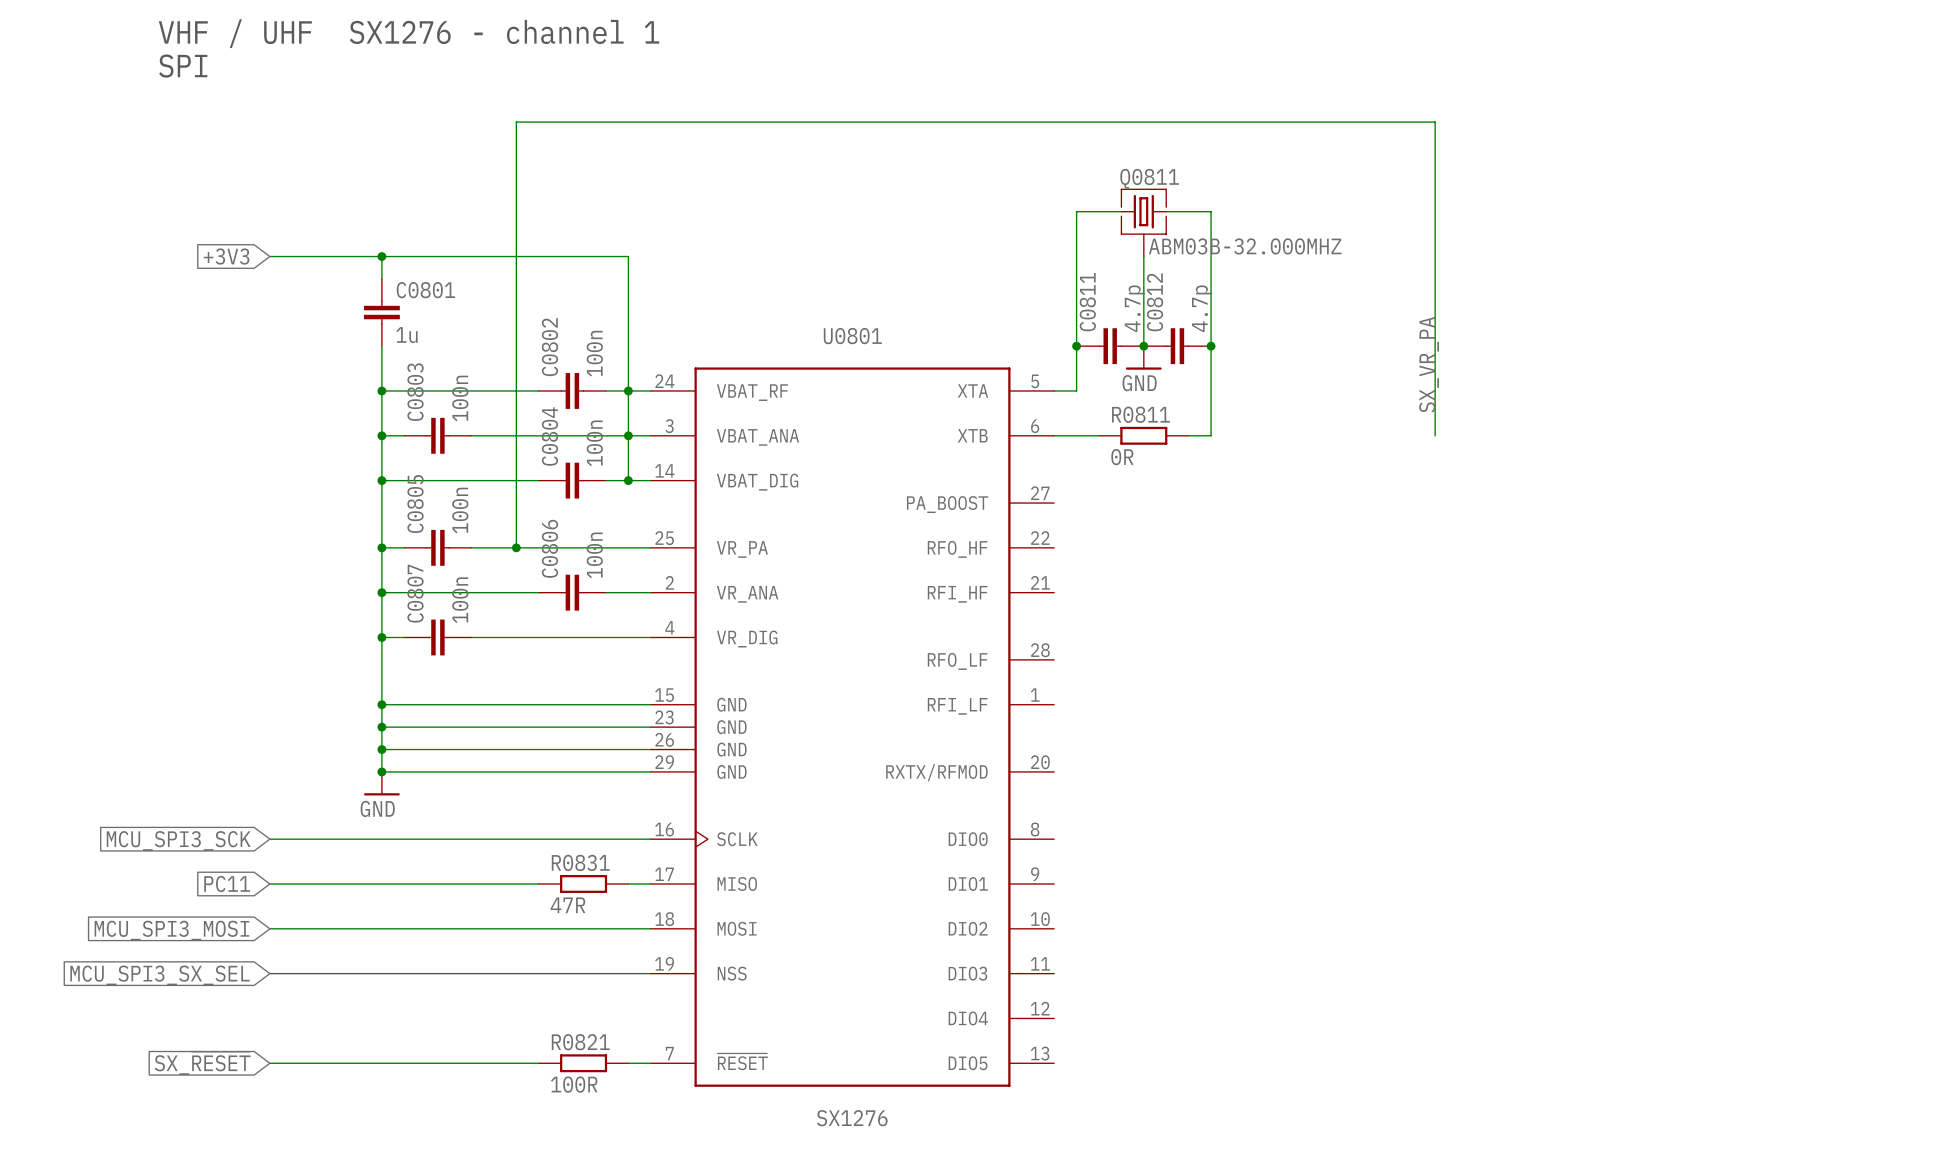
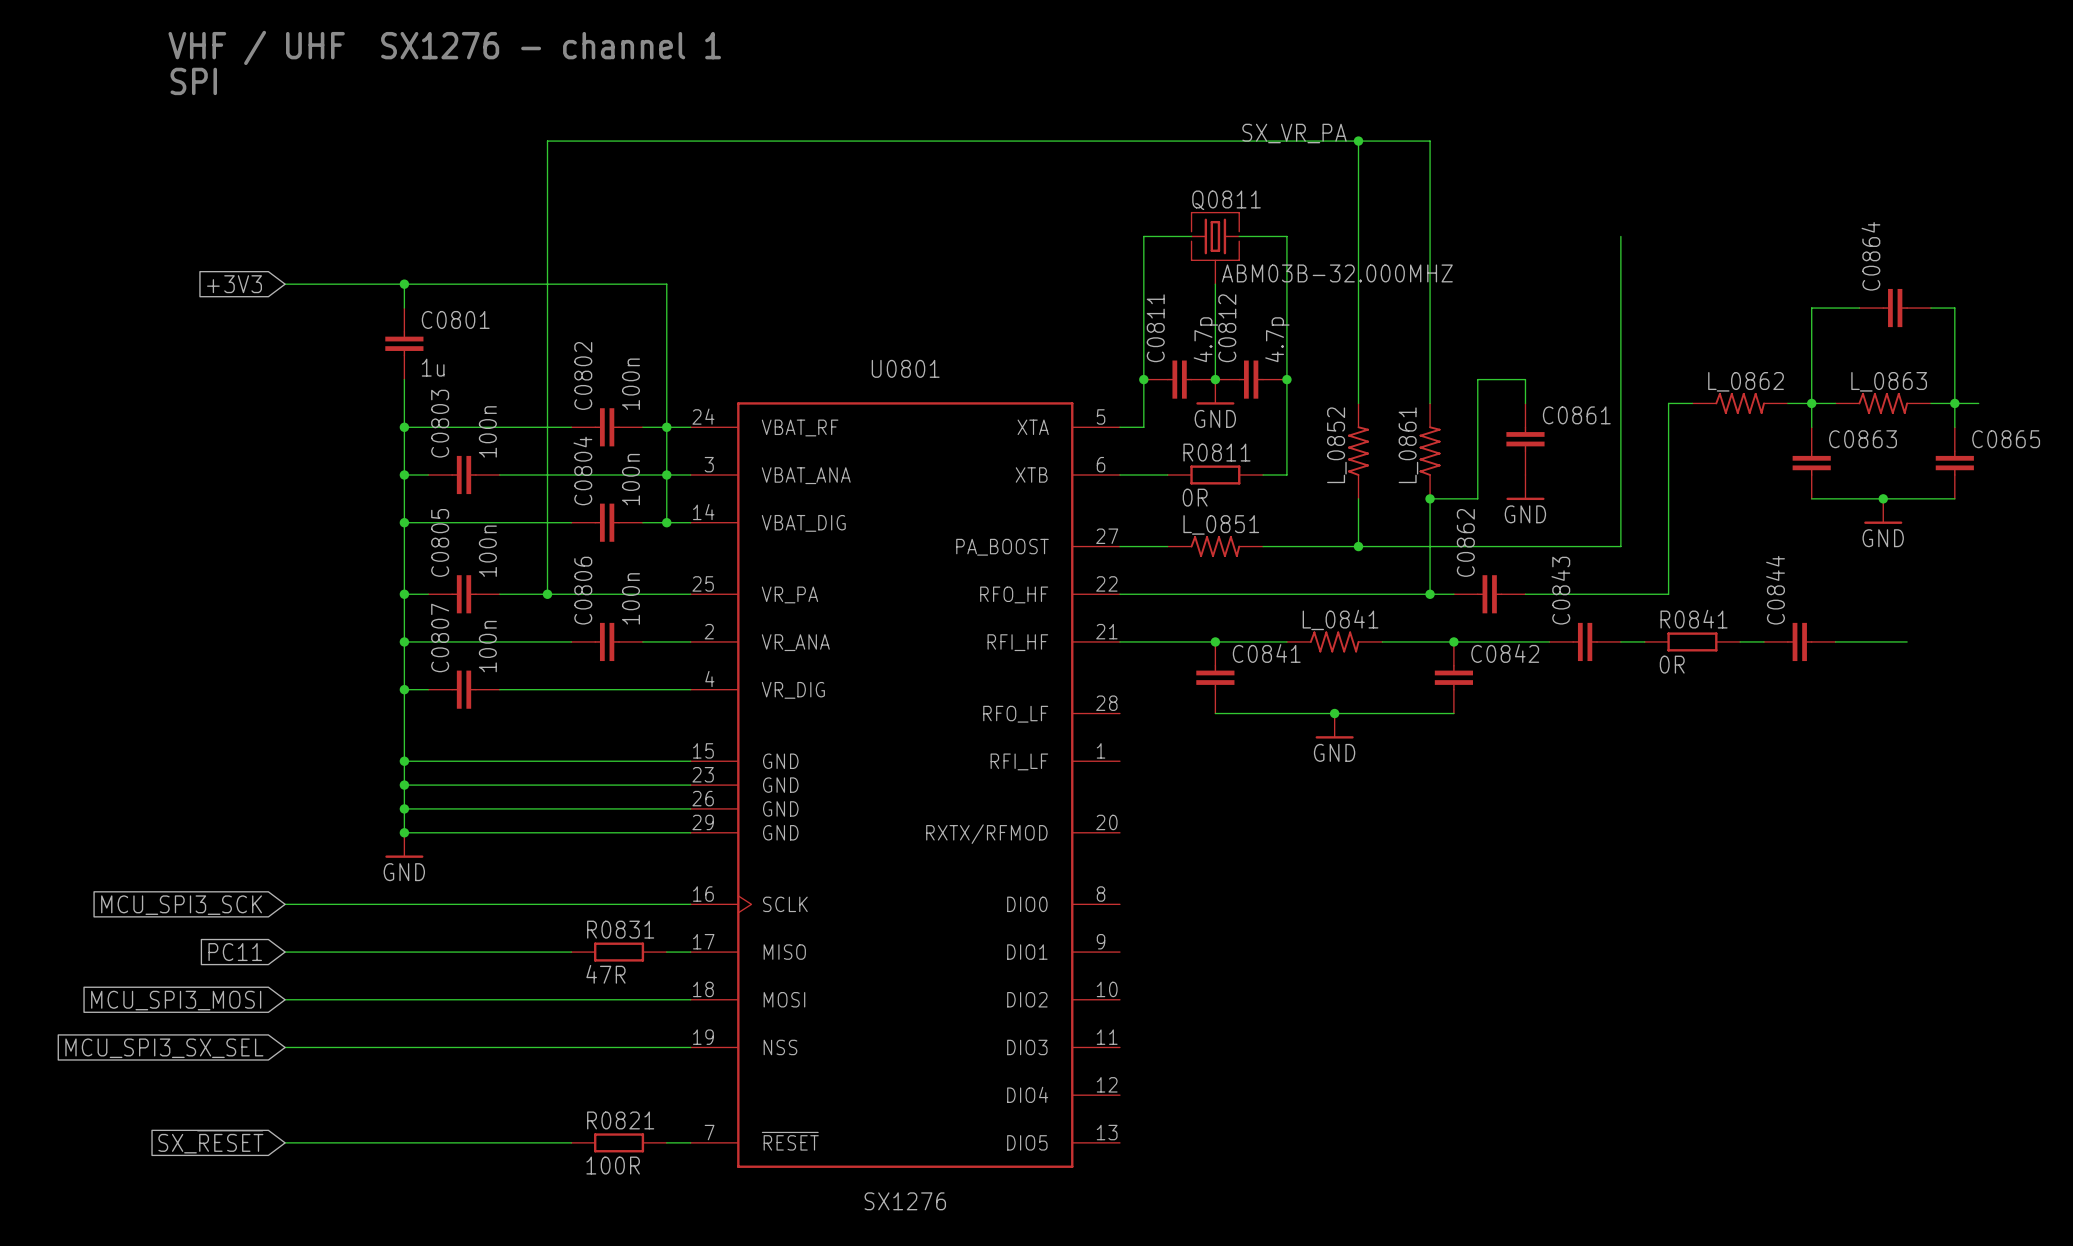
label: none -> SX_VR_PA (1294, 133)
wire: none -> (1358, 141) (1358, 403)
junction: none -> (1358, 141)
wire: (1345, 122) (1435, 122) (1435, 346) -> (1430, 141) (1430, 403)
wire: none -> (1620, 236) (1620, 546) (1263, 546)
wire: none -> (1859, 308) (1811, 308) (1811, 427)
C0864: none -> (1895, 308)
wire: none -> (1930, 308) (1954, 308) (1954, 427)
wire: none -> (1525, 379) (1477, 379) (1477, 498) (1430, 498) (1430, 594)
label: SX_VR_PA (1429, 364) -> none
wire: none -> (1692, 403) (1668, 403) (1668, 594) (1525, 594)
L_0862: none -> (1740, 403)
wire: none -> (1787, 403) (1835, 403)
junction: none -> (1811, 403)
L_0863: none -> (1883, 403)
wire: none -> (1930, 403) (1978, 403)
junction: none -> (1954, 403)
C0861: none -> (1525, 439)
L_0852: none -> (1358, 451)
L_0861: none -> (1430, 451)
C0863: none -> (1811, 463)
C0865: none -> (1954, 463)
power symbol: none -> GND (1525, 487)
wire: none -> (1358, 498) (1358, 546)
junction: none -> (1430, 498)
wire: none -> (1811, 498) (1954, 498)
junction: none -> (1883, 498)
power symbol: none -> GND (1883, 511)
wire: none -> (1119, 546) (1167, 546)
L_0851: none -> (1215, 546)
junction: none -> (1358, 546)
wire: none -> (1119, 594) (1453, 594)
junction: none -> (1430, 594)
C0862: none -> (1489, 594)
wire: none -> (1119, 641) (1286, 641)
junction: none -> (1215, 641)
L_0841: none -> (1334, 641)
wire: none -> (1382, 641) (1549, 641)
junction: none -> (1453, 641)
C0843: none -> (1585, 641)
wire: none -> (1620, 641) (1644, 641)
R0841: none -> 0R (1692, 641)
wire: none -> (1740, 641) (1764, 641)
C0844: none -> (1799, 641)
wire: none -> (1835, 641) (1907, 641)
C0841: none -> (1215, 677)
C0842: none -> (1453, 677)
wire: none -> (1215, 713) (1453, 713)
junction: none -> (1334, 713)
power symbol: none -> GND (1334, 726)

